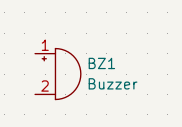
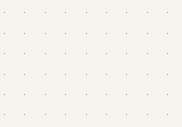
BZ1: Buzzer (57, 74) -> none

